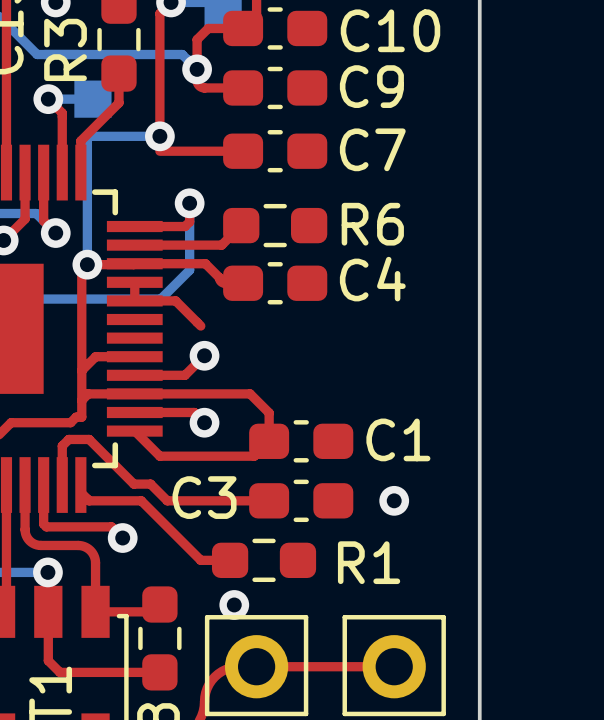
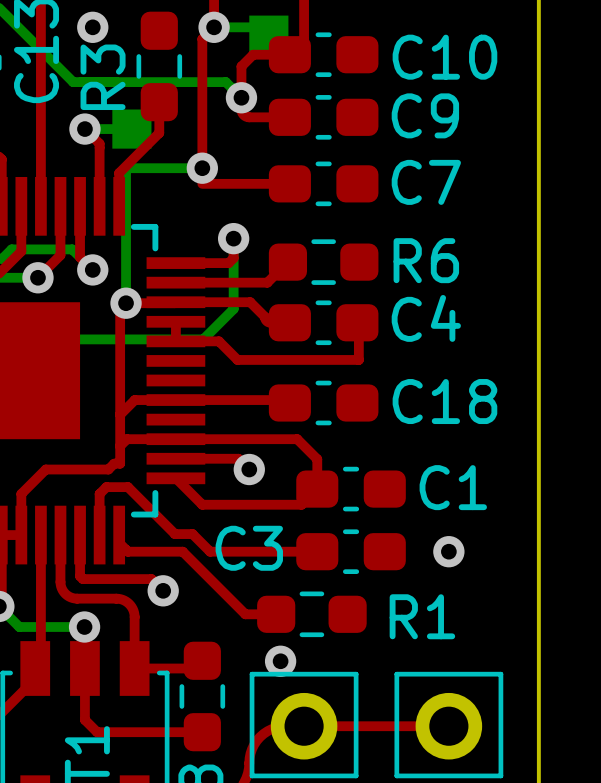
top track: (193, 318) (200, 326) -> (237, 359) (358, 359) (357, 322)
top track: (204, 355) (185, 375) (134, 375) -> none
via: (204, 355) -> none
top track: none -> (175, 400) (286, 400) (289, 402)
C18: none -> (323, 402)

